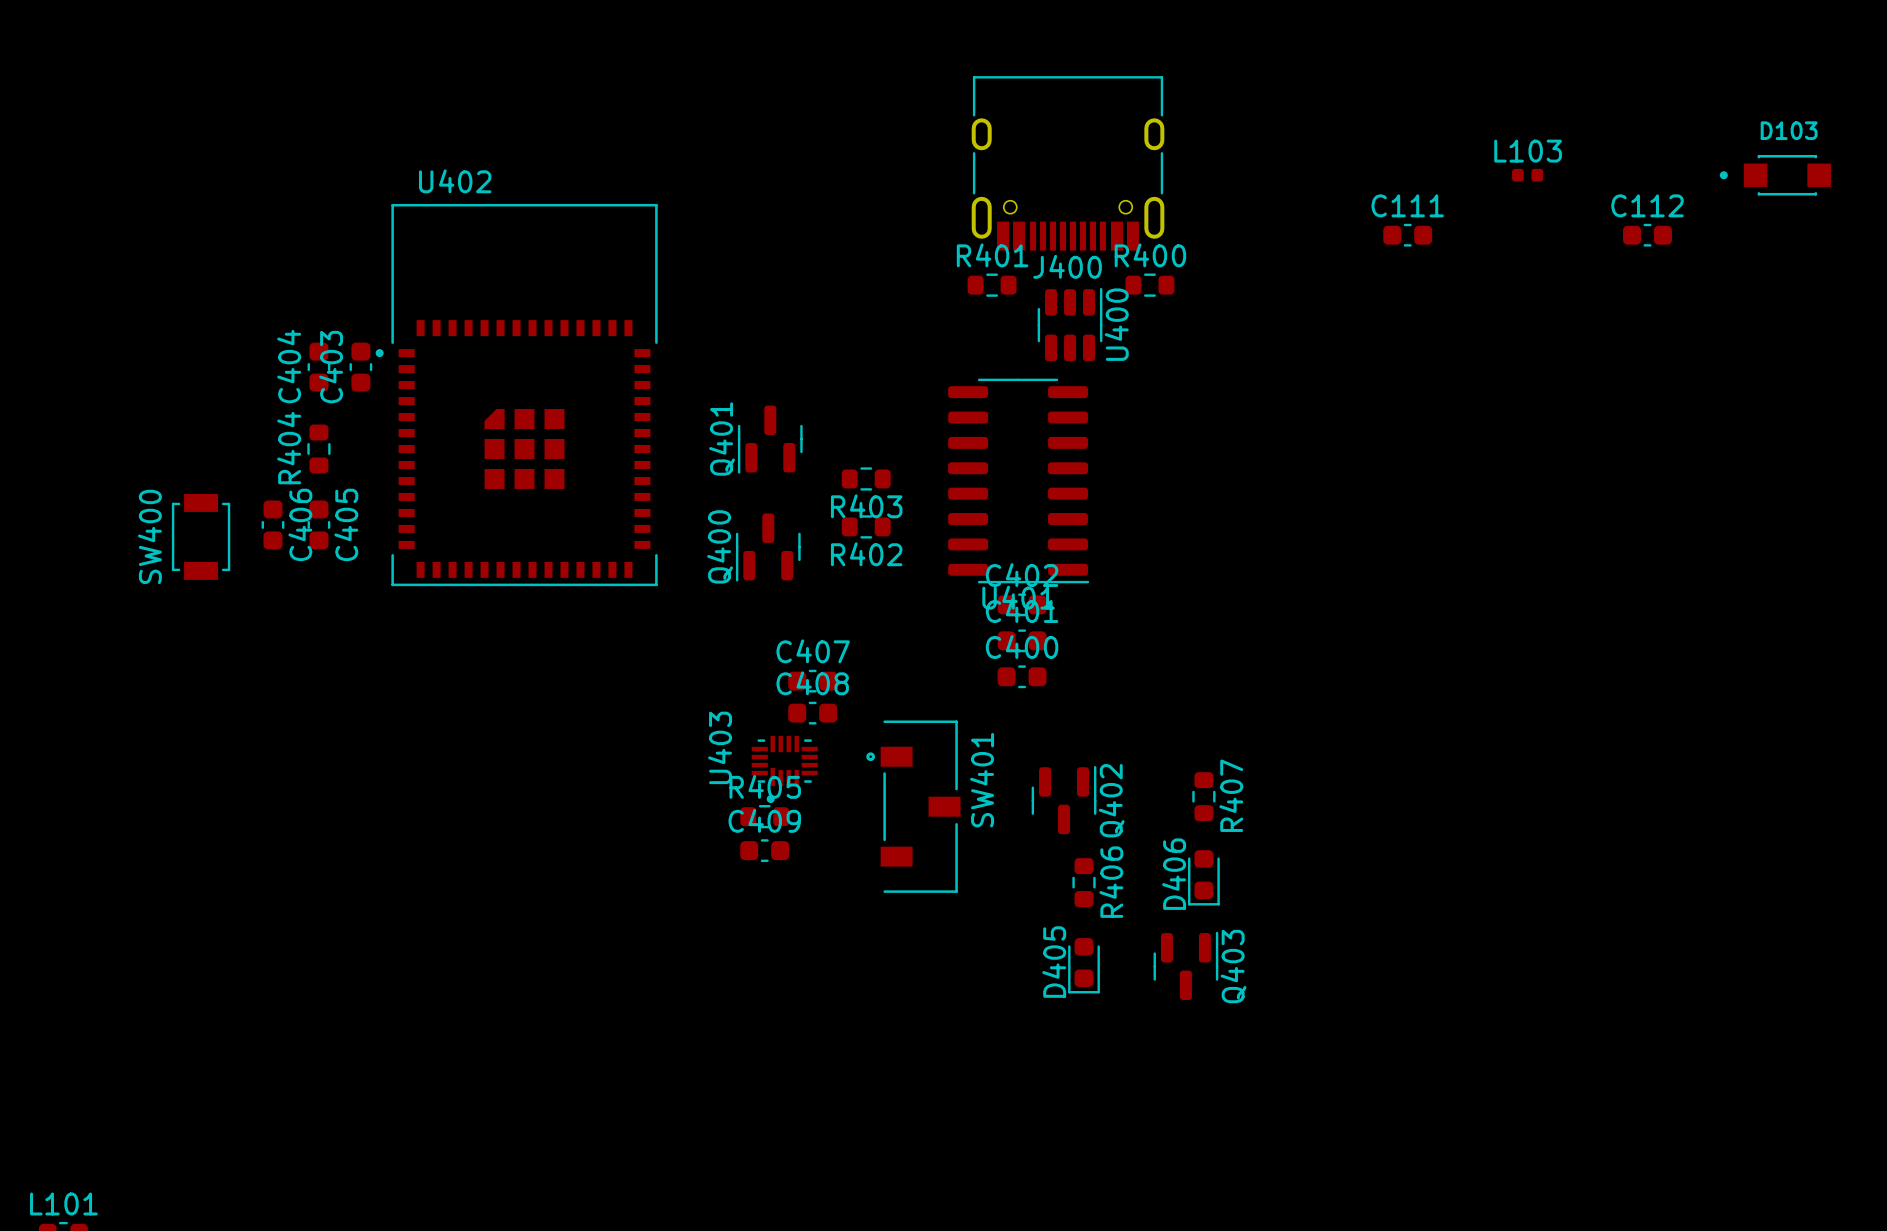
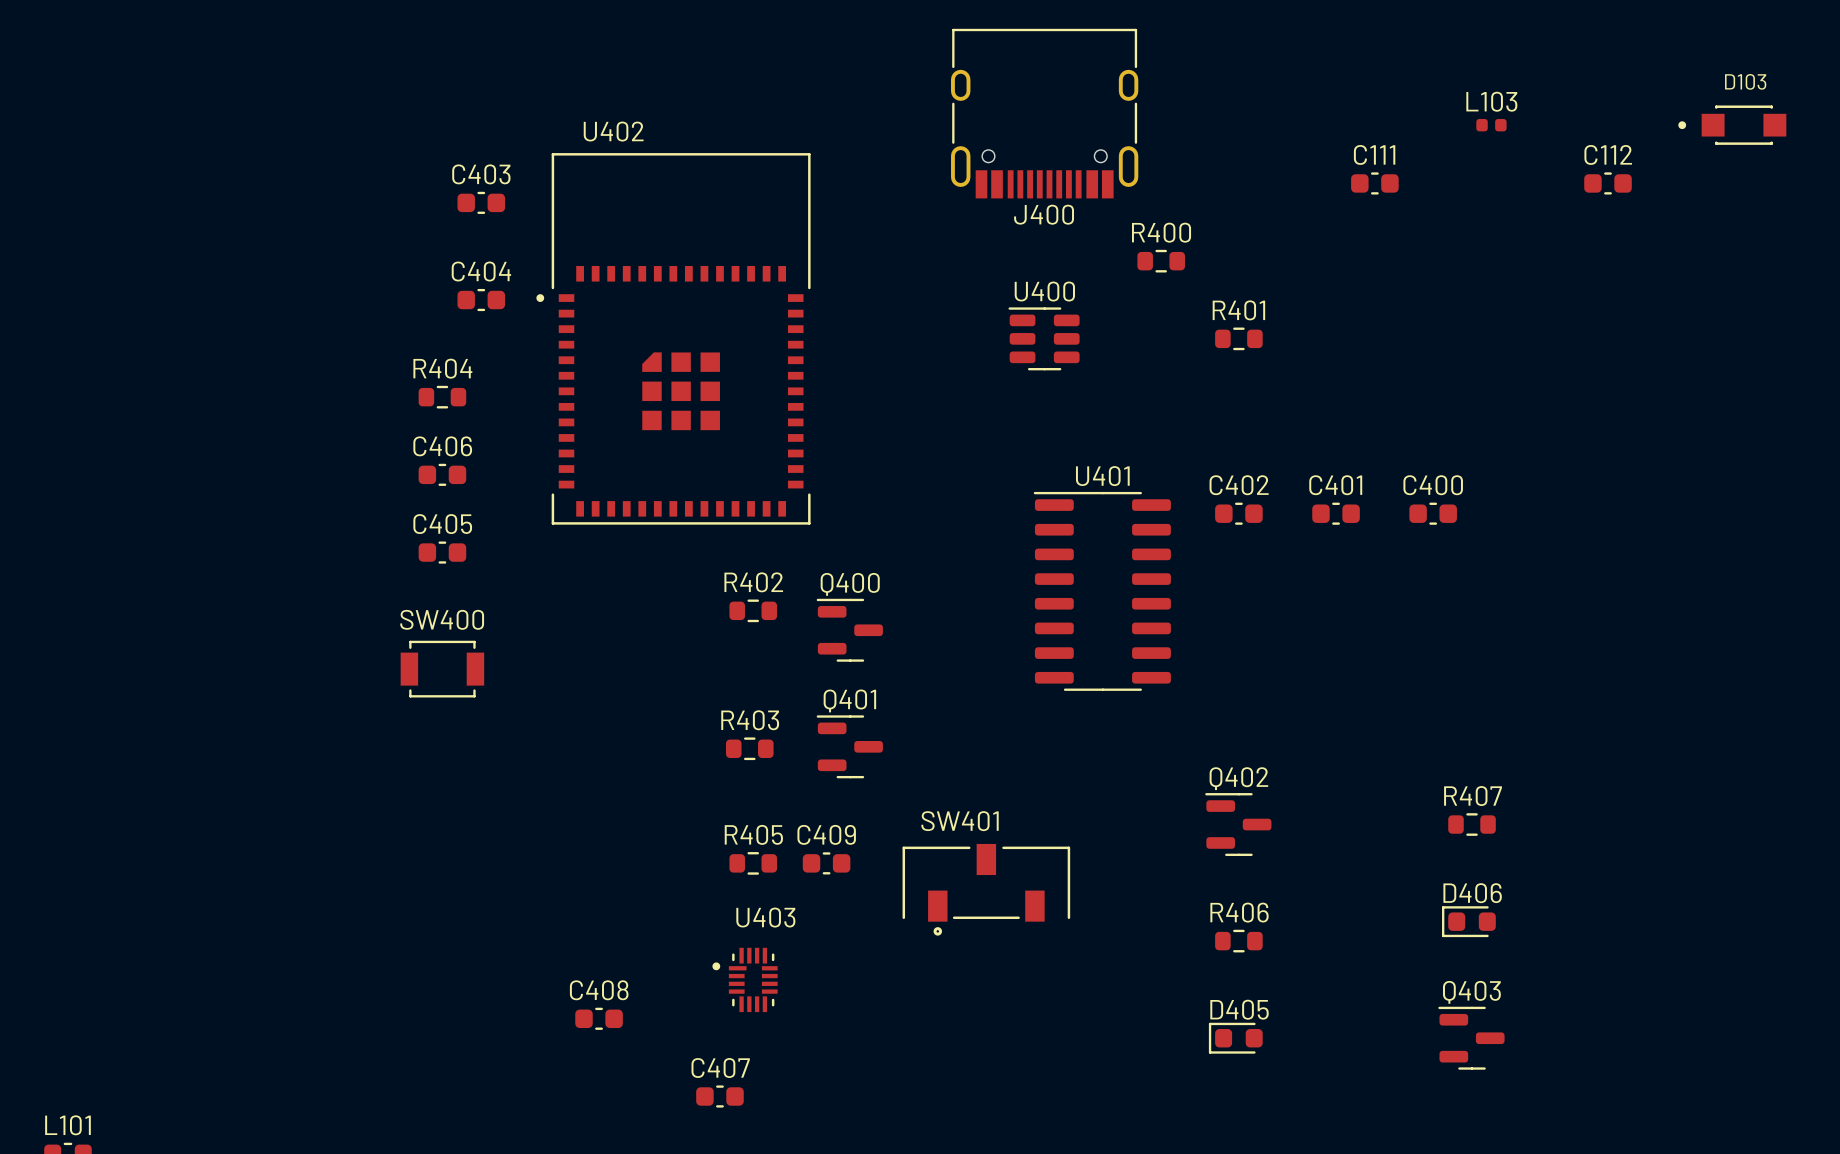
R401 position: (992, 285) -> (1238, 338)
R400 position: (1149, 285) -> (1161, 261)
U400 rotation: 0° (1070, 324) -> 90° counterclockwise (1044, 338)
U400 position: (1070, 324) -> (1044, 338)
C404 rotation: 0° (318, 367) -> 90° clockwise (481, 300)
C404 position: (318, 367) -> (481, 300)
C403 rotation: 0° (360, 367) -> 90° clockwise (481, 202)
C403 position: (360, 367) -> (481, 202)
U402 position: (516, 395) -> (673, 338)
Q401 rotation: 0° (770, 439) -> 90° clockwise (849, 746)
Q401 position: (770, 439) -> (849, 746)
R404 rotation: 0° (318, 448) -> 90° clockwise (442, 397)
R404 position: (318, 448) -> (442, 397)
R403: (866, 478) -> none
U401 rotation: 0° (1018, 480) -> 180° (1102, 591)
U401 position: (1018, 480) -> (1102, 591)
C406 rotation: 0° (272, 524) -> 90° clockwise (442, 474)
C406 position: (272, 524) -> (442, 474)
C406 name position: C406 (300, 524) -> C406 (442, 446)
C405 rotation: 0° (318, 524) -> 90° clockwise (442, 552)
C405 position: (318, 524) -> (442, 552)
C405 name position: C405 (346, 524) -> C405 (442, 524)
R402 position: (866, 526) -> (753, 610)
SW400 rotation: 0° (201, 536) -> 90° clockwise (442, 669)
SW400 position: (201, 536) -> (442, 669)
Q400 rotation: 0° (768, 547) -> 90° clockwise (849, 630)
Q400 position: (768, 547) -> (849, 630)
R402 name position: R402 (866, 554) -> R402 (753, 582)
C402 position: (1022, 604) -> (1238, 513)
C401 position: (1022, 640) -> (1336, 513)
C400 position: (1022, 676) -> (1433, 513)
C407 position: (812, 681) -> (719, 1096)
C408 position: (812, 713) -> (599, 1018)
U403 rotation: 0° (784, 769) -> 90° clockwise (745, 979)
U403 position: (784, 769) -> (745, 979)
R405 name: R405 (765, 786) -> R403 (750, 720)
R407 name position: R407 (1231, 795) -> R407 (1473, 796)
R407 rotation: 0° (1203, 796) -> 90° clockwise (1472, 824)
R407 position: (1203, 796) -> (1472, 824)
Q402 rotation: 0° (1064, 800) -> 90° counterclockwise (1238, 824)
Q402 position: (1064, 800) -> (1238, 824)
SW401 rotation: 0° (913, 806) -> 90° counterclockwise (986, 889)
SW401 position: (913, 806) -> (986, 889)
C409 position: (764, 850) -> (826, 863)
D406 rotation: 0° (1203, 877) -> 90° clockwise (1468, 921)
D406 position: (1203, 877) -> (1468, 921)
R406 rotation: 0° (1084, 882) -> 90° clockwise (1238, 941)
R406 position: (1084, 882) -> (1238, 941)
R406 name position: R406 (1111, 882) -> R406 (1239, 912)
R405: none -> (753, 863)
D405 rotation: 0° (1084, 965) -> 90° clockwise (1235, 1038)
D405 position: (1084, 965) -> (1235, 1038)
Q403 rotation: 0° (1185, 965) -> 90° counterclockwise (1471, 1038)
Q403 position: (1185, 965) -> (1471, 1038)

